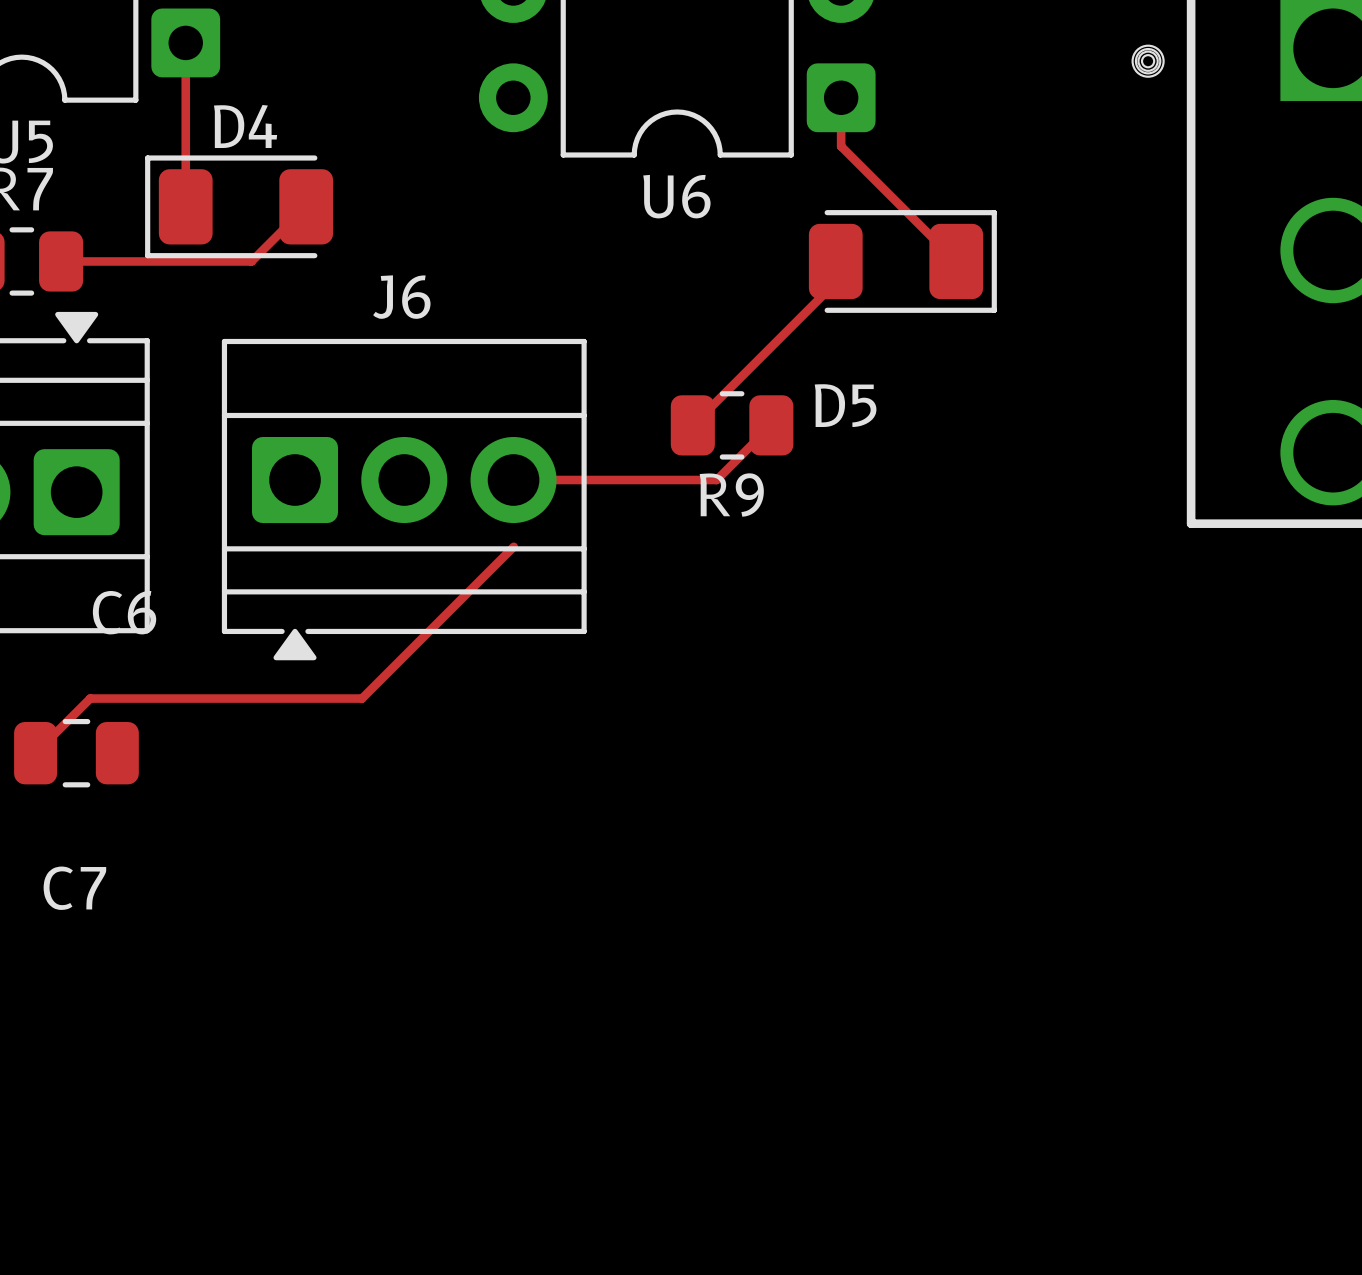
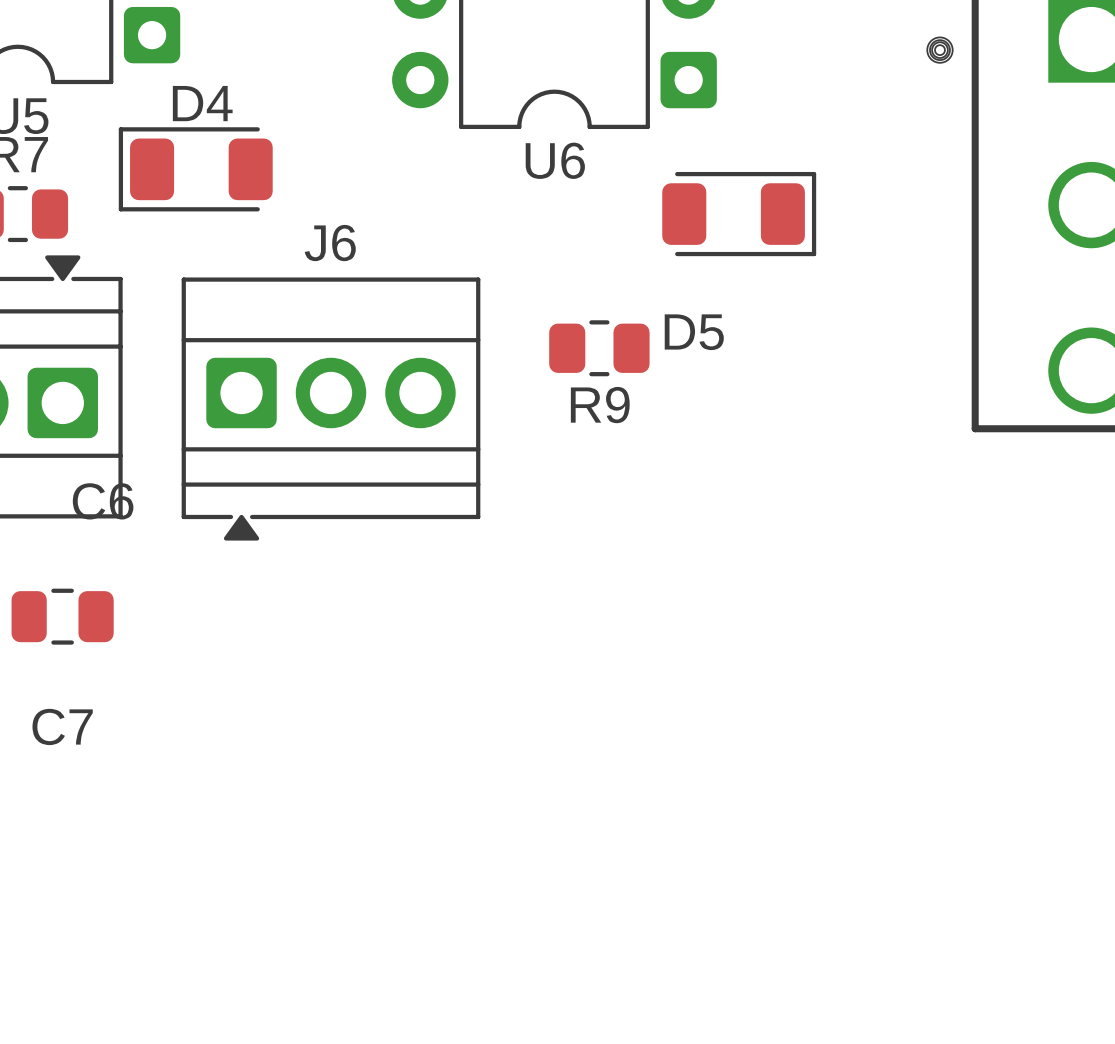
track: (185, 42) (185, 206) -> none
track: (841, 97) (841, 146) (956, 261) -> none
track: (306, 206) (251, 261) (61, 261) -> none
track: (835, 282) (692, 425) -> none
track: (771, 425) (716, 480) (513, 480) -> none
track: (513, 546) (362, 698) (90, 698) (35, 753) -> none

